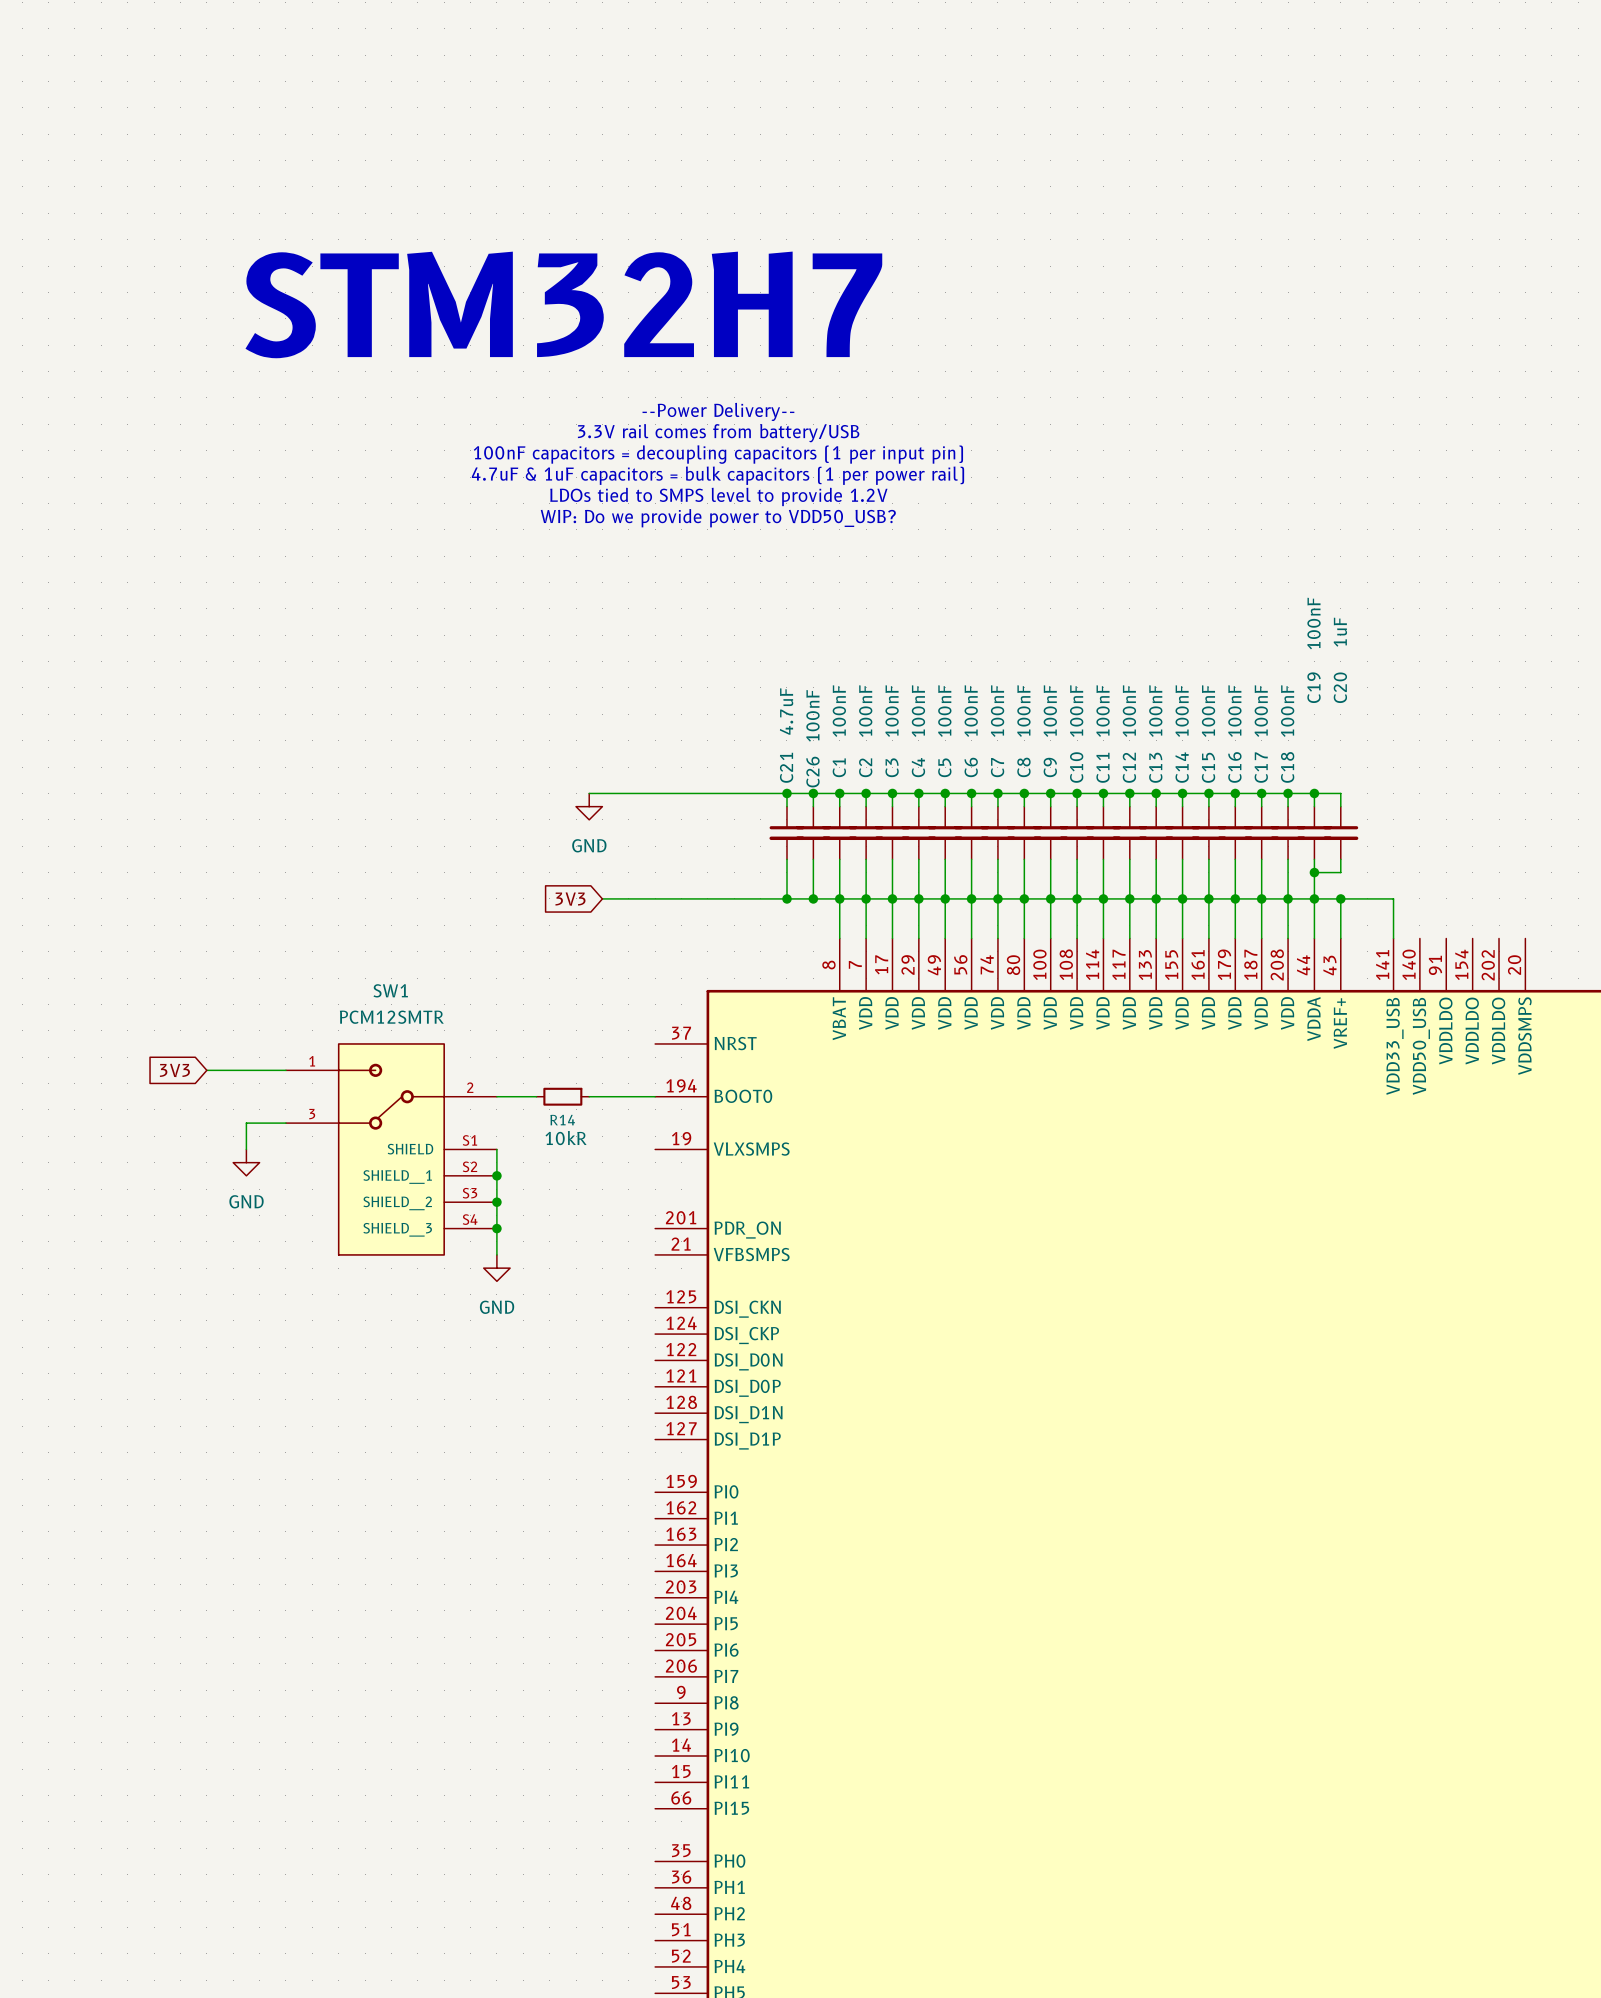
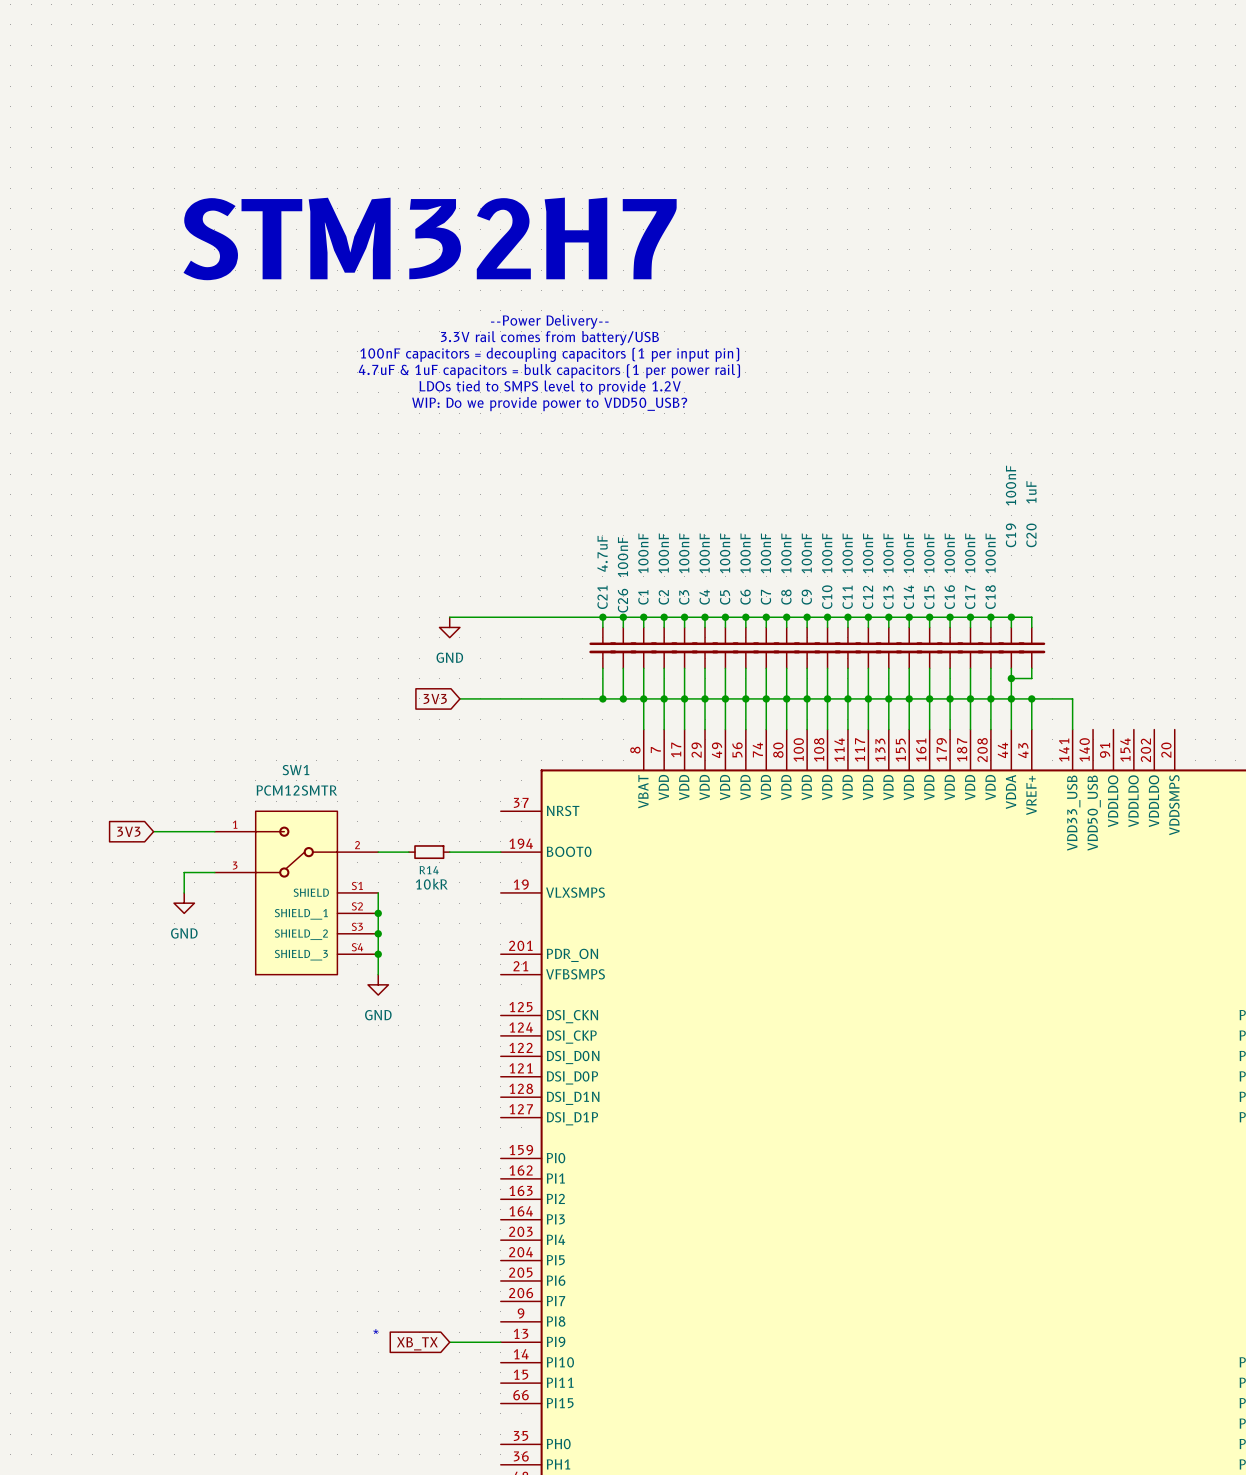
text: none -> * (375, 1331)
wire: none -> (449, 1342) (500, 1342)
global label: none -> XB_TX (417, 1343)

